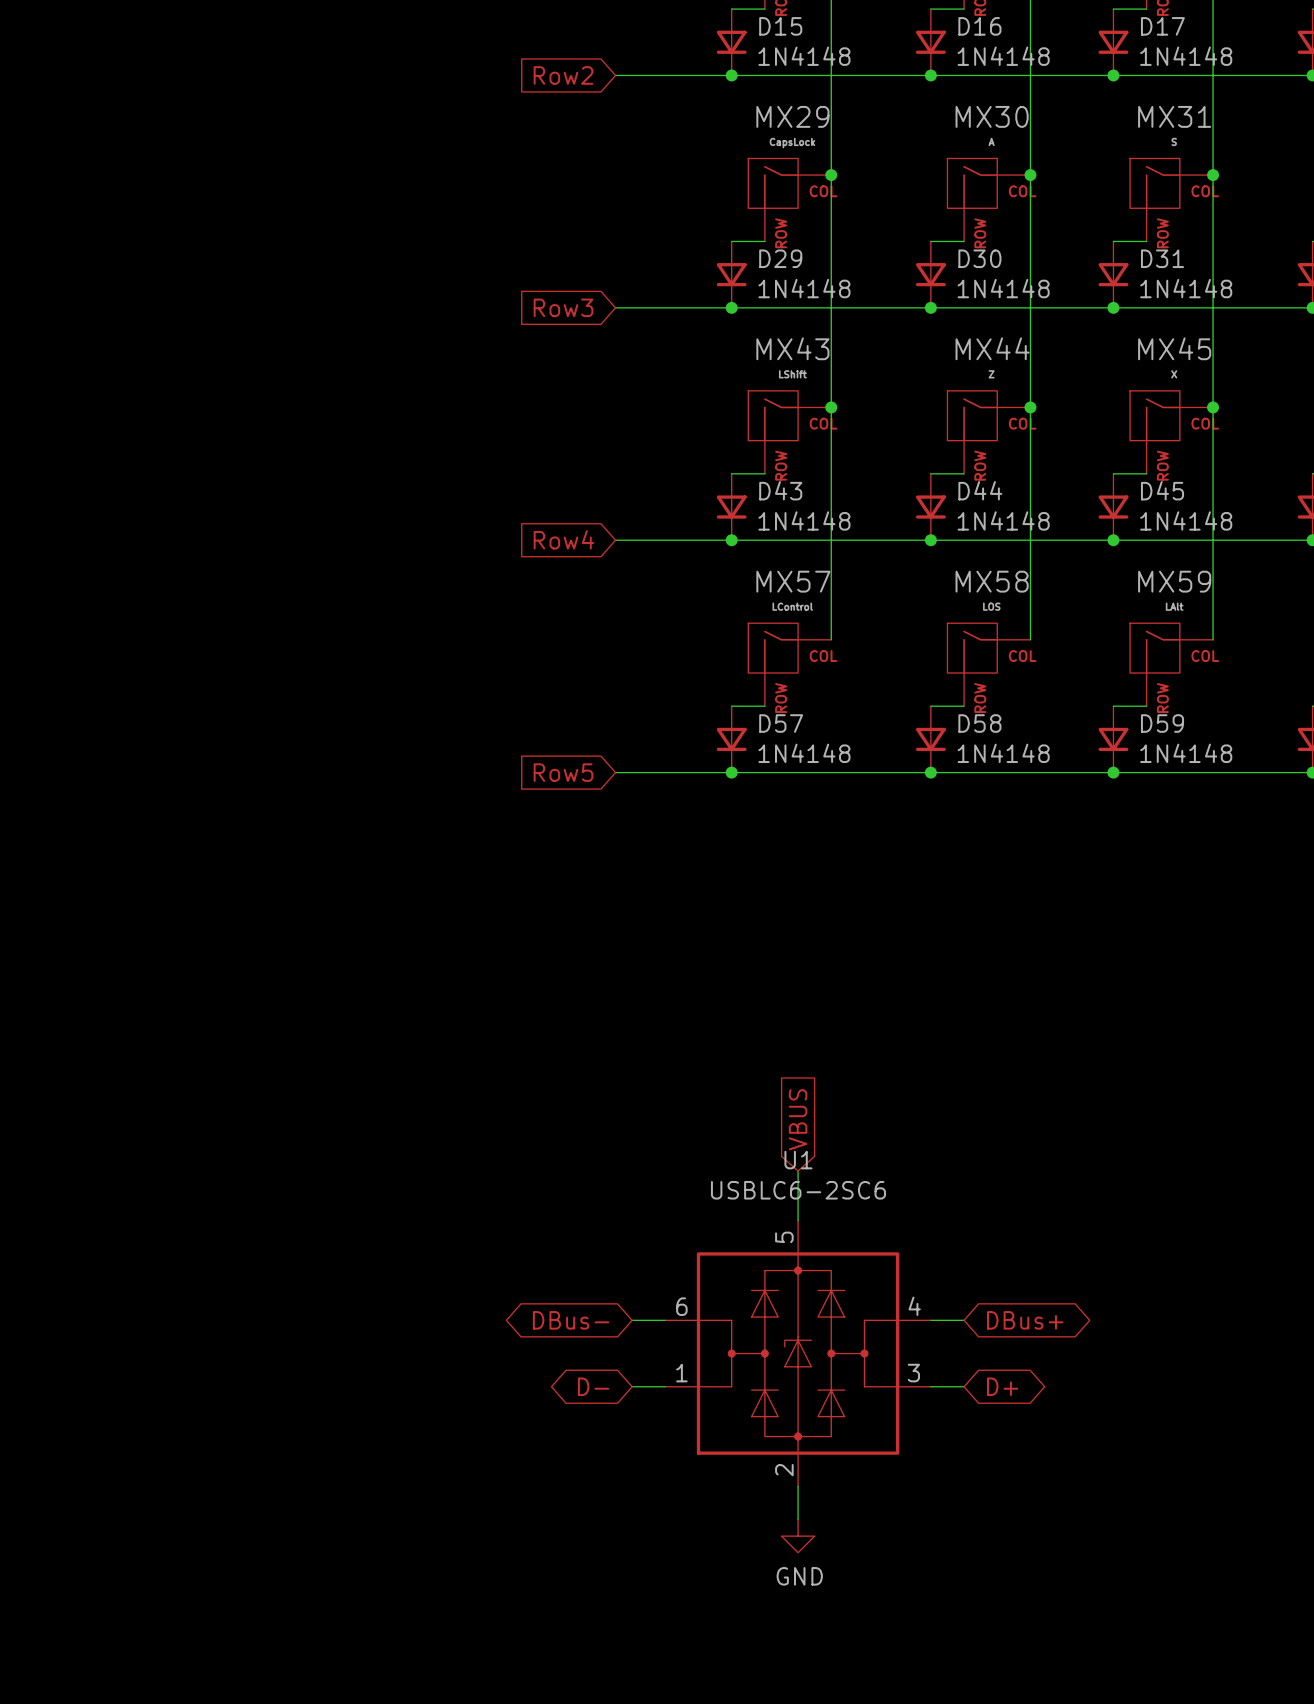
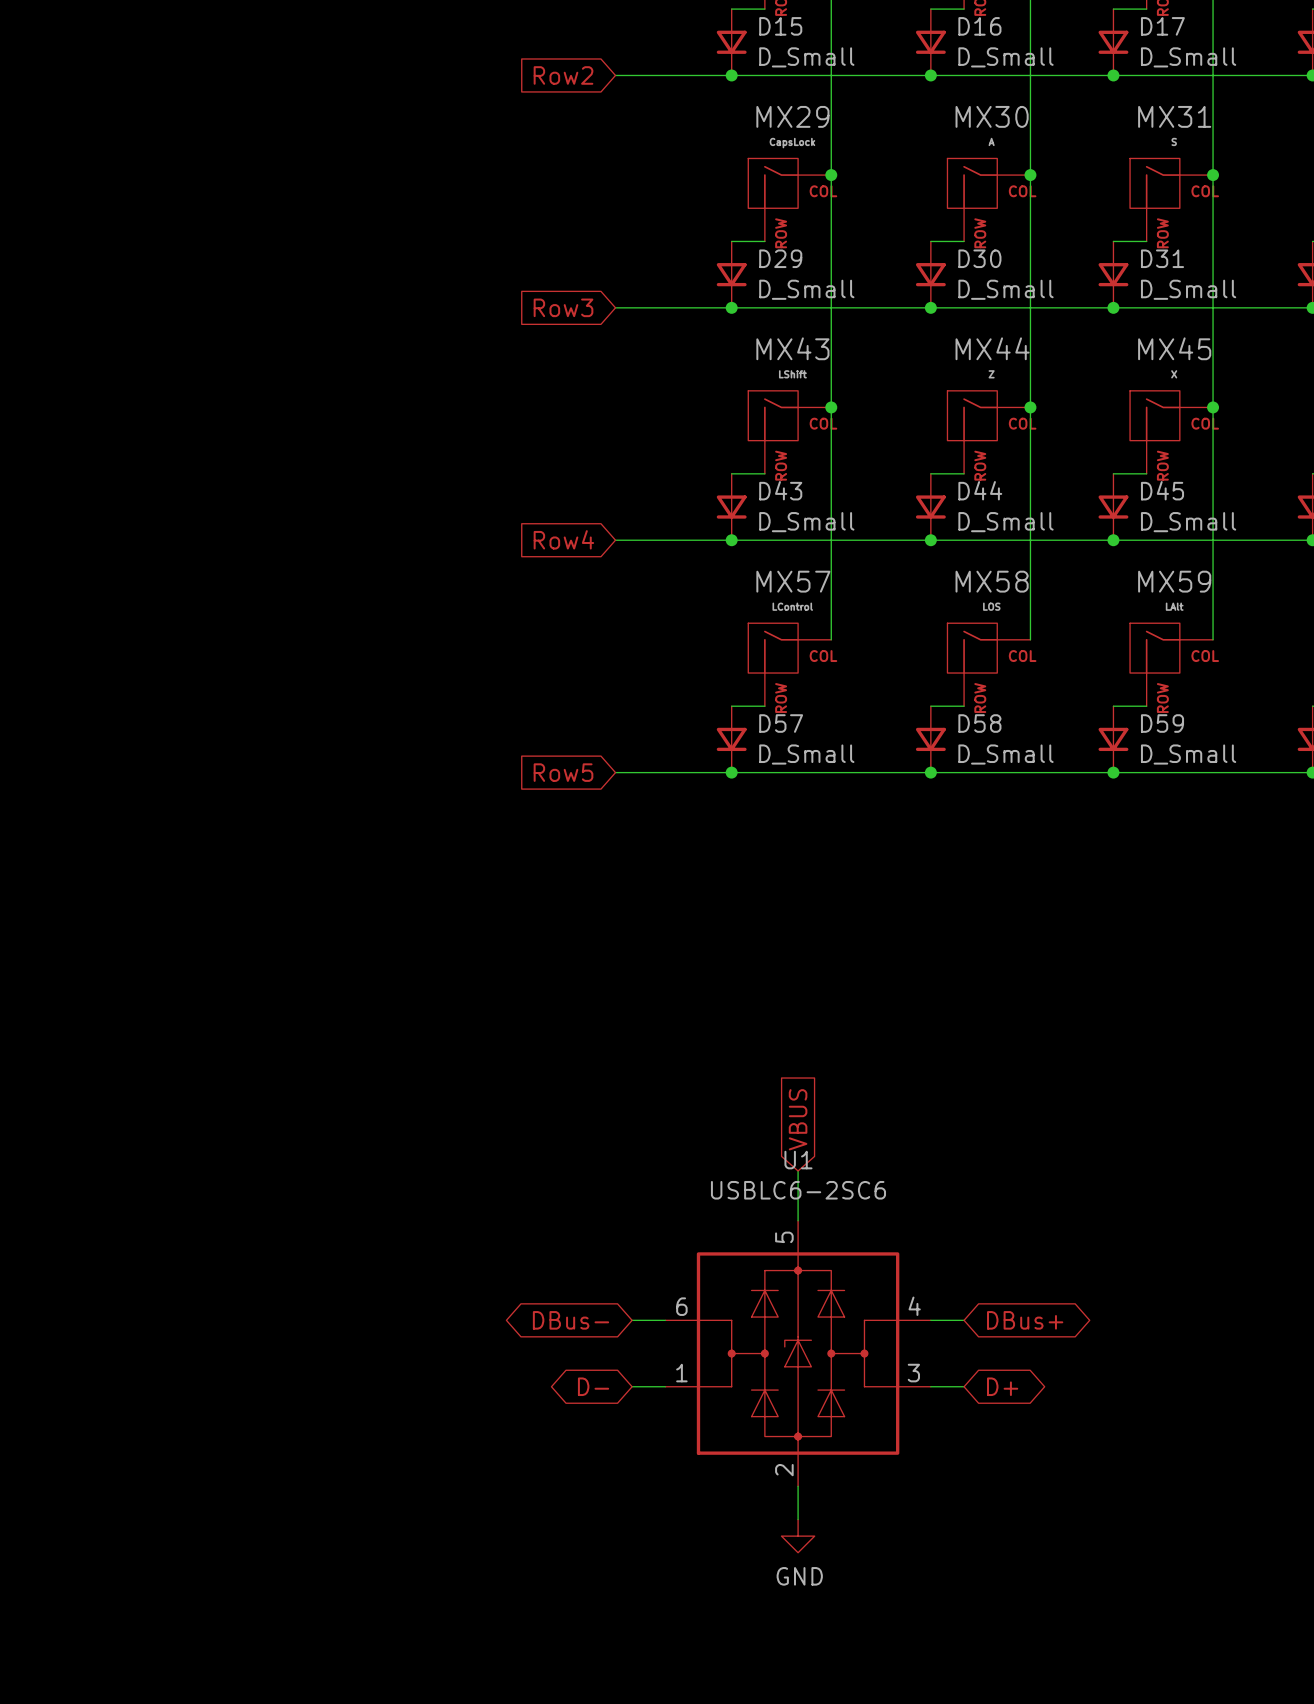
D15 value: 1N4148 (804, 56) -> D_Small (806, 57)
D16 value: 1N4148 (1003, 56) -> D_Small (1006, 57)
D17 value: 1N4148 (1186, 56) -> D_Small (1188, 57)
D29 value: 1N4148 (804, 288) -> D_Small (806, 289)
D30 value: 1N4148 (1003, 288) -> D_Small (1006, 289)
D31 value: 1N4148 (1186, 288) -> D_Small (1188, 289)
D43 value: 1N4148 (804, 520) -> D_Small (806, 522)
D44 value: 1N4148 (1003, 520) -> D_Small (1006, 522)
D45 value: 1N4148 (1186, 520) -> D_Small (1188, 522)
D57 value: 1N4148 (804, 753) -> D_Small (806, 754)
D58 value: 1N4148 (1003, 753) -> D_Small (1006, 754)
D59 value: 1N4148 (1186, 753) -> D_Small (1188, 754)

